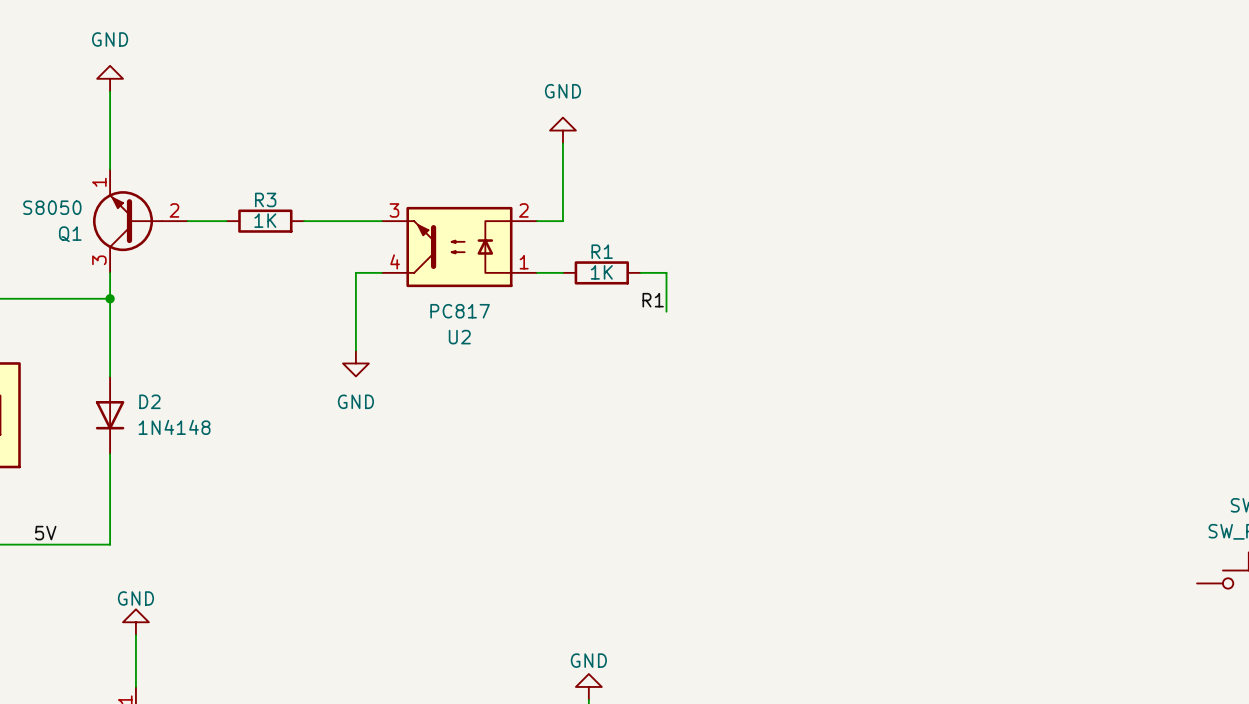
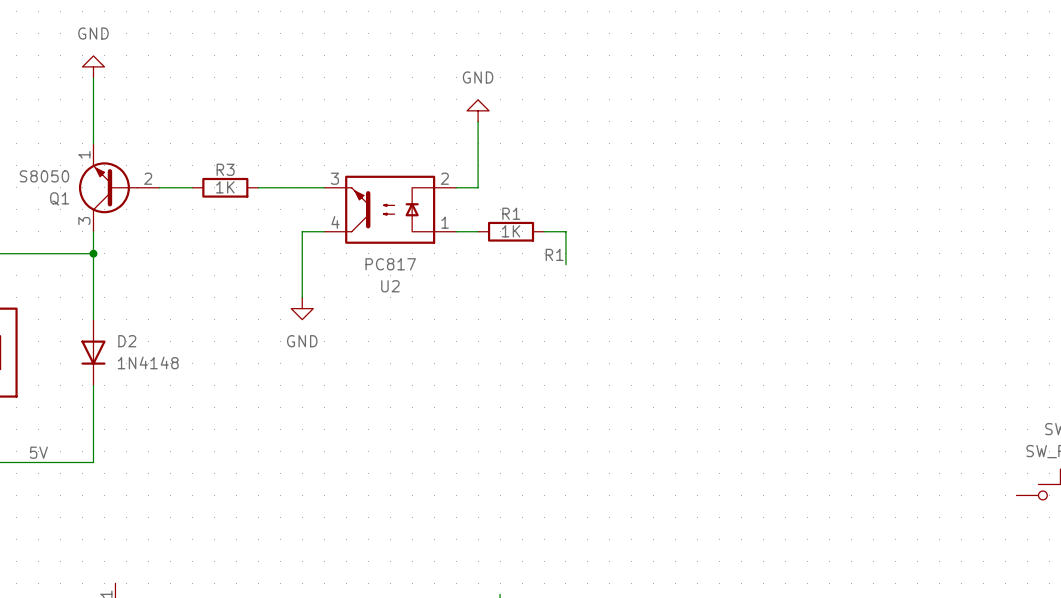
power symbol: GND (135, 622) -> none
wire: (135, 635) (135, 686) -> none
power symbol: GND (588, 686) -> none

